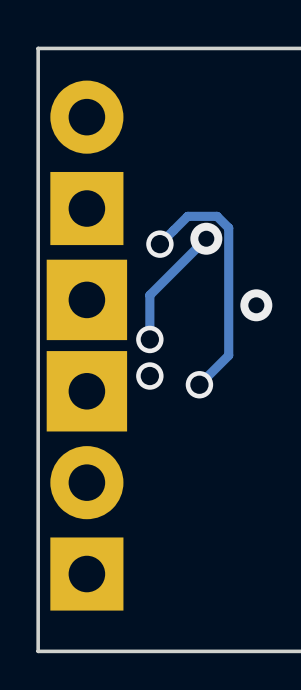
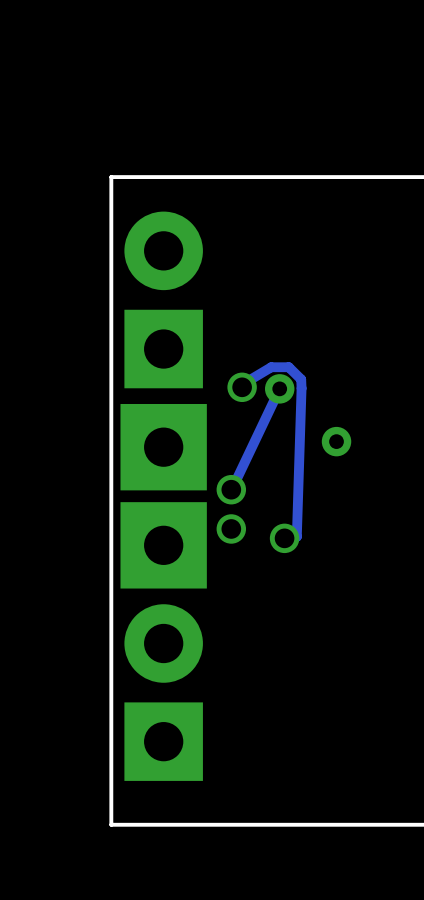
track: (206, 238) (149, 295) (149, 339) -> none
via position: (206, 238) -> (279, 388)
track: none -> (245, 382) (271, 367) (288, 367) (301, 379) (295, 536)
track: (159, 244) (187, 216) (217, 216) (228, 227) (228, 355) (199, 384) -> none
track: none -> (279, 388) (232, 488)
via position: (256, 305) -> (336, 441)

